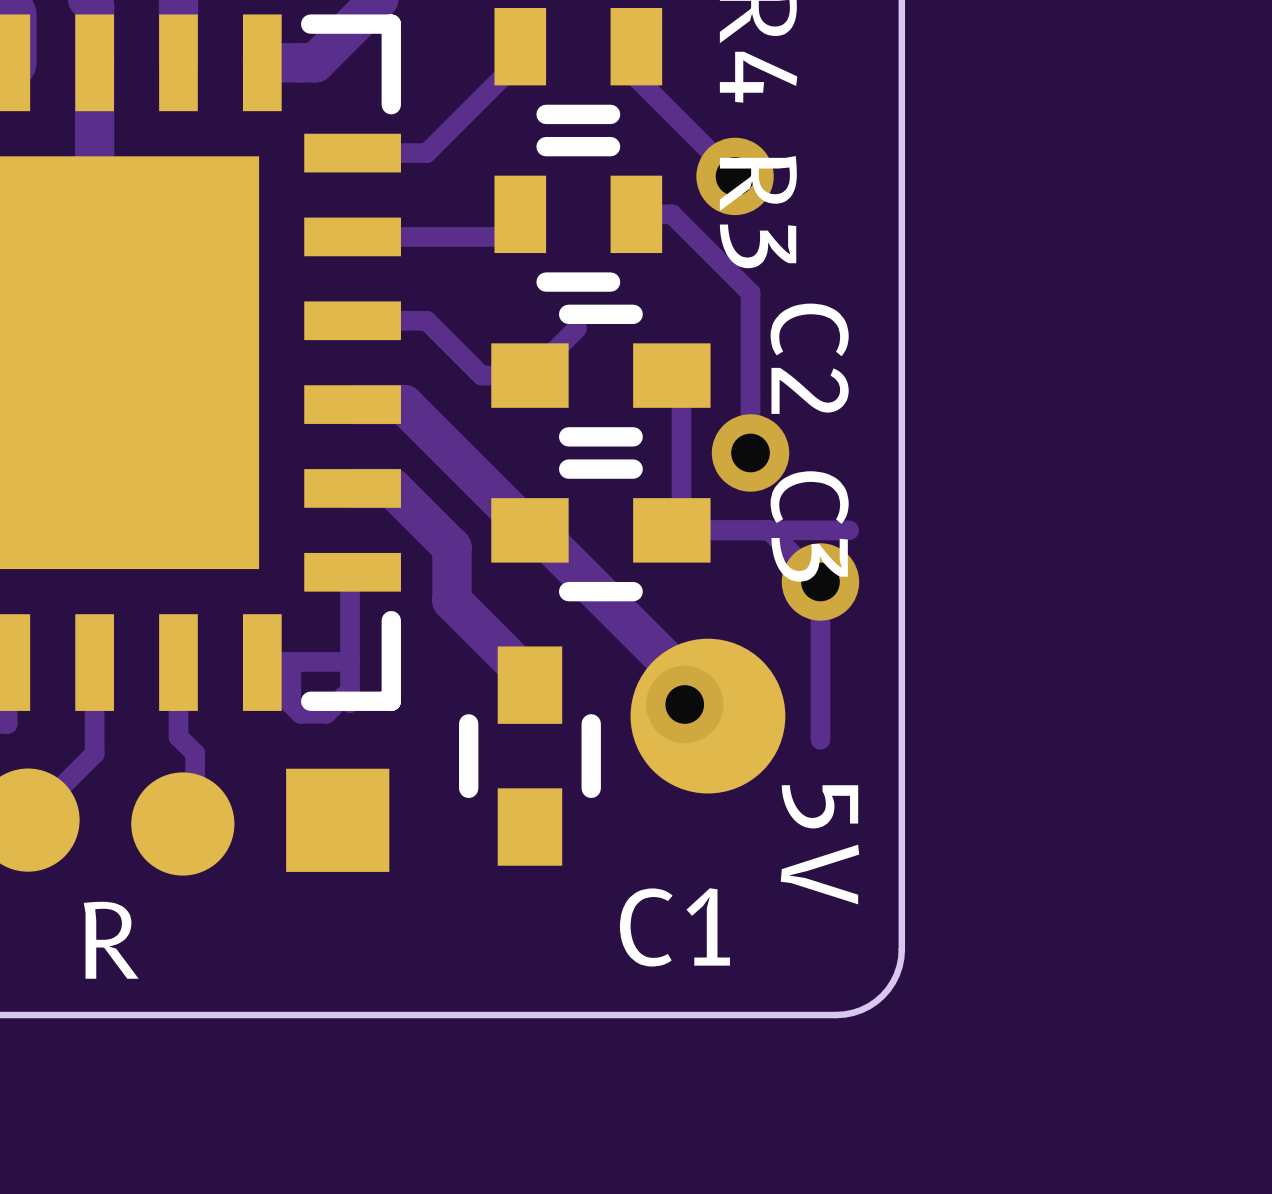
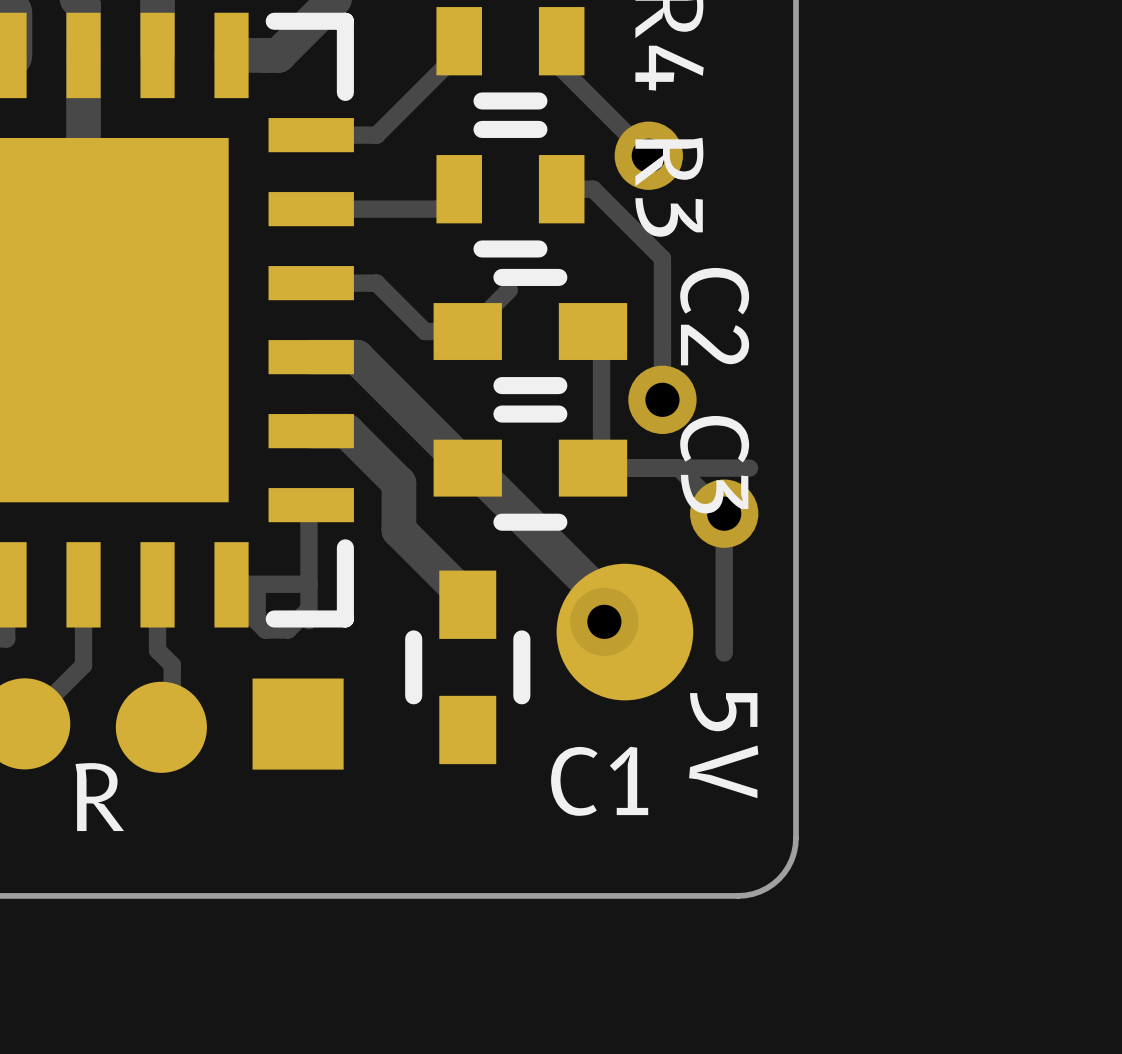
C1 name position: C1 (674, 927) -> C1 (599, 781)
text position: R (111, 940) -> R (99, 797)

